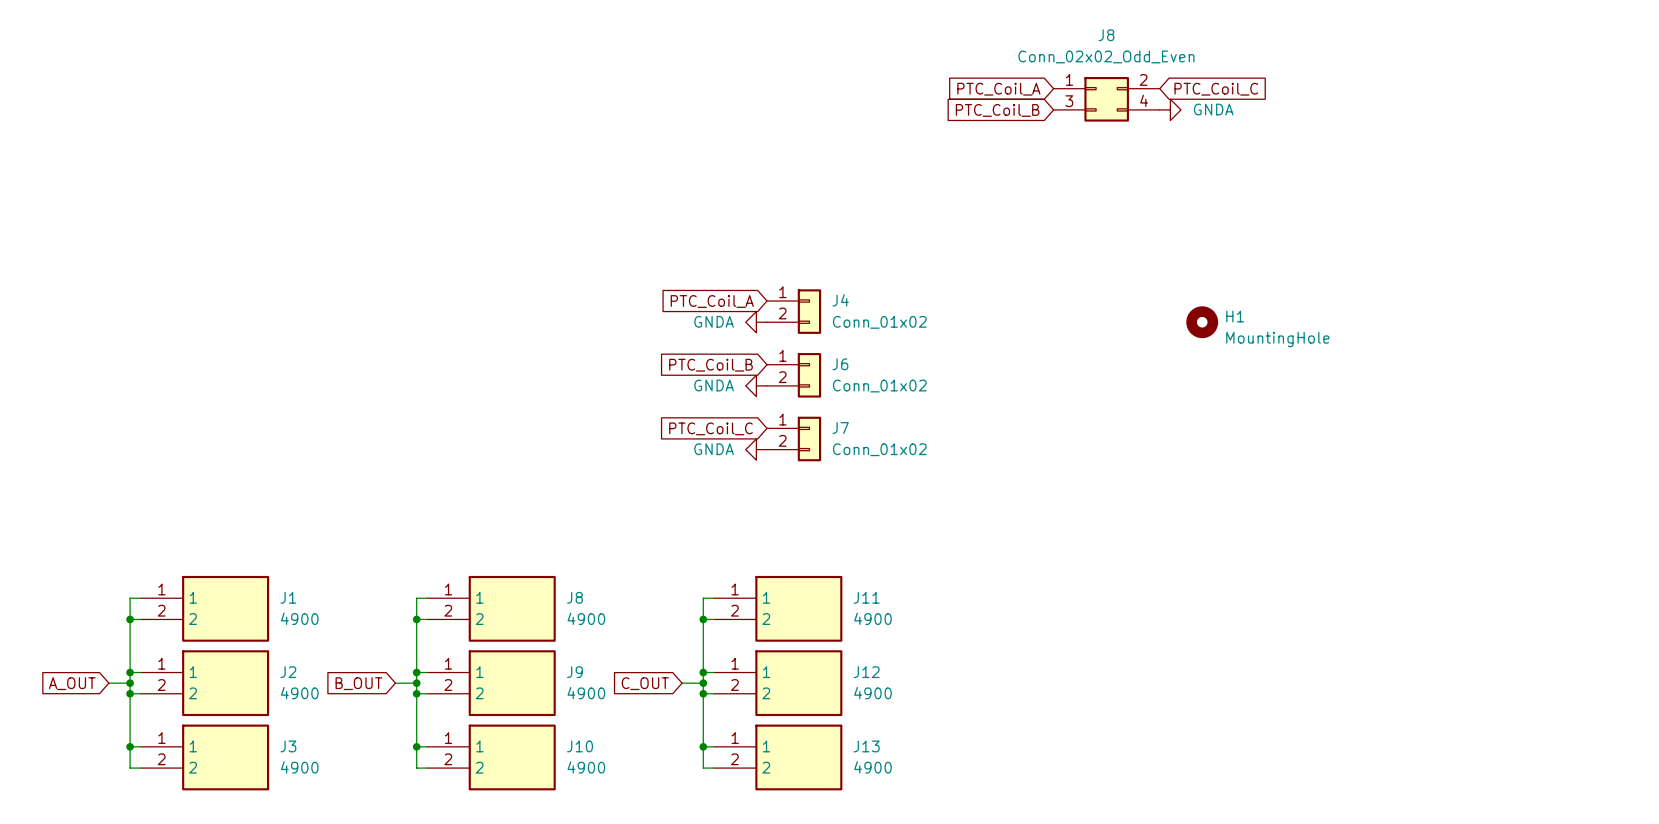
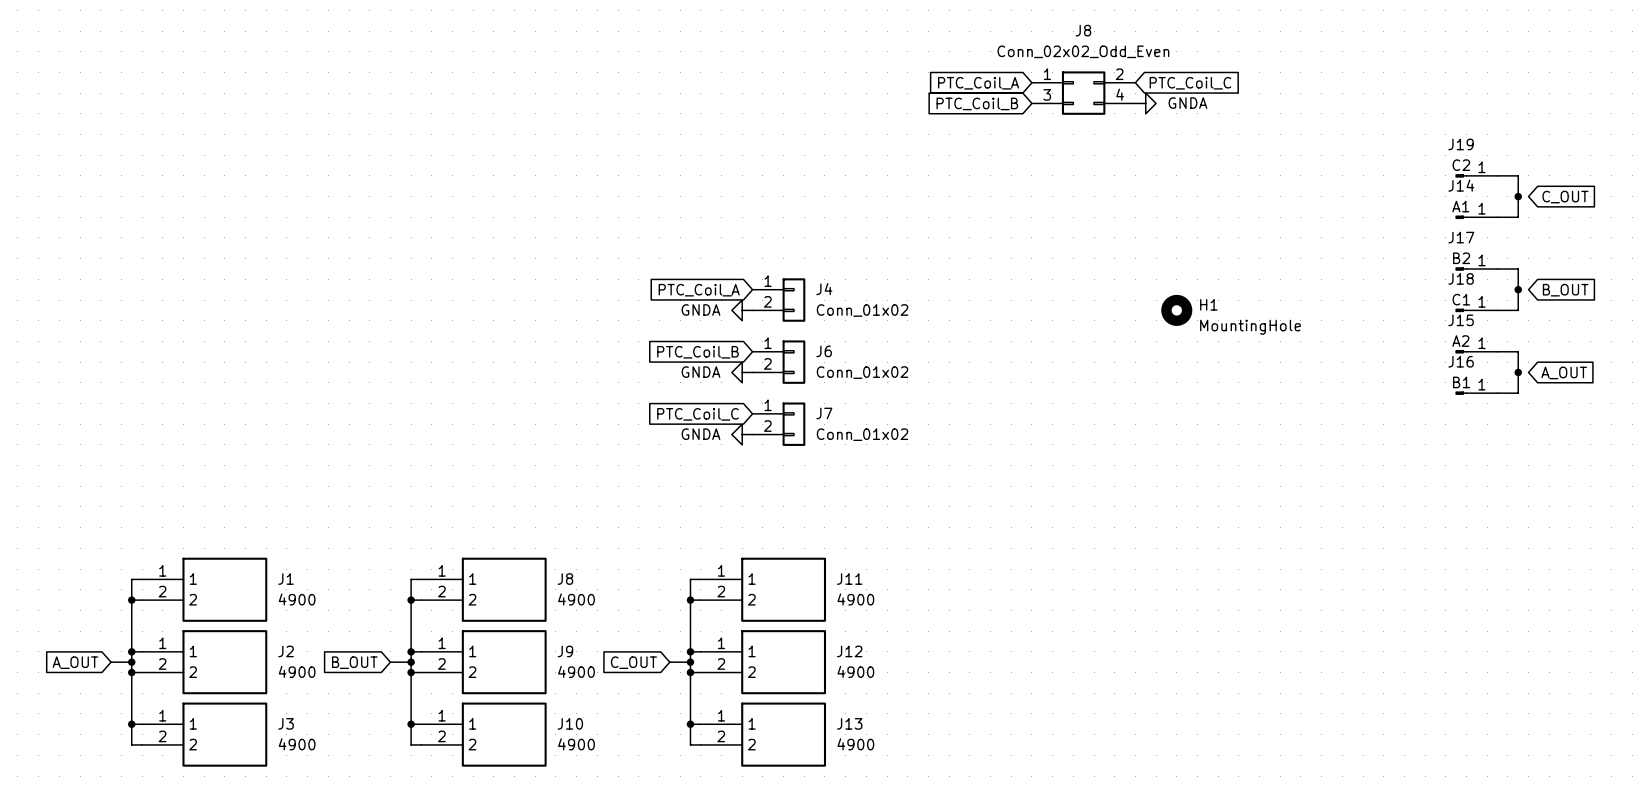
J19: none -> C2 (1476, 175)
wire: none -> (1497, 175) (1518, 175) (1518, 217) (1497, 217)
junction: none -> (1518, 196)
global label: none -> C_OUT (1565, 197)
J14: none -> A1 (1476, 217)
J17: none -> B2 (1476, 269)
wire: none -> (1497, 269) (1518, 269) (1518, 310) (1497, 310)
junction: none -> (1518, 289)
global label: none -> B_OUT (1565, 290)
J18: none -> C1 (1476, 310)
J15: none -> A2 (1476, 351)
wire: none -> (1497, 351) (1518, 351) (1518, 393) (1497, 393)
junction: none -> (1518, 372)
global label: none -> A_OUT (1564, 372)
J16: none -> B1 (1476, 393)

